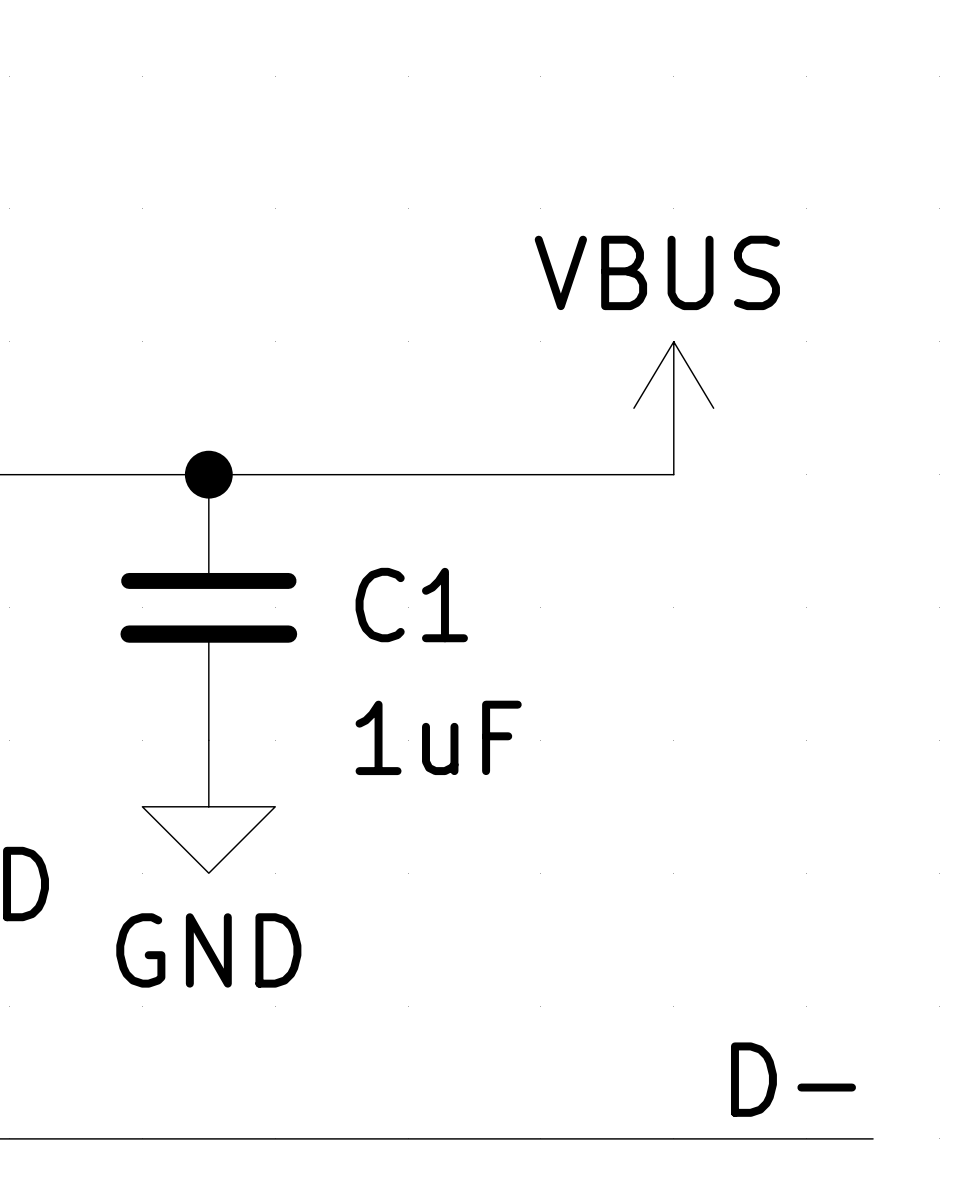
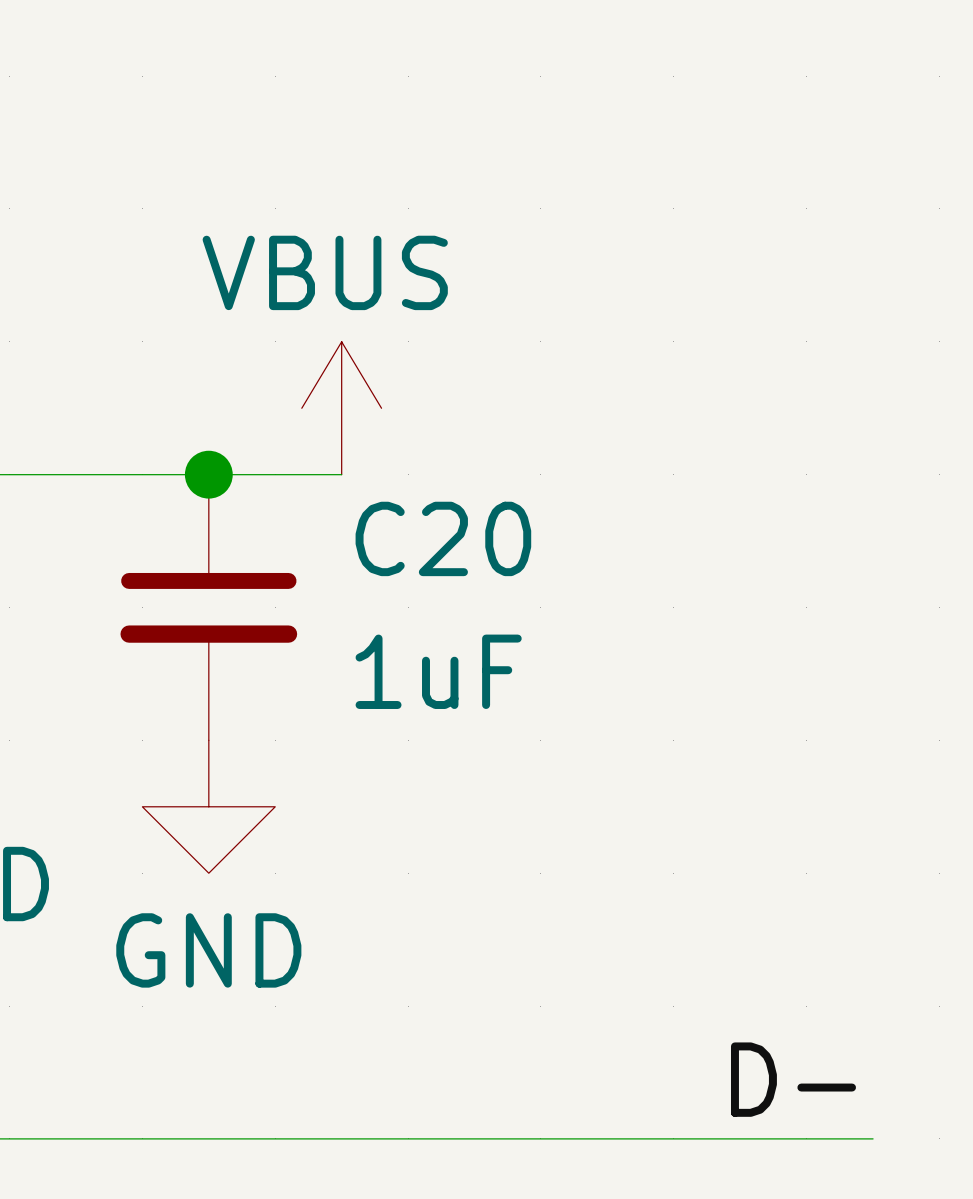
power symbol position: VBUS (673, 408) -> VBUS (341, 408)
wire: (341, 474) (673, 474) -> none
C1 name: C1 (411, 605) -> C20 (443, 538)
C1 value position: 1uF (438, 737) -> 1uF (438, 671)

